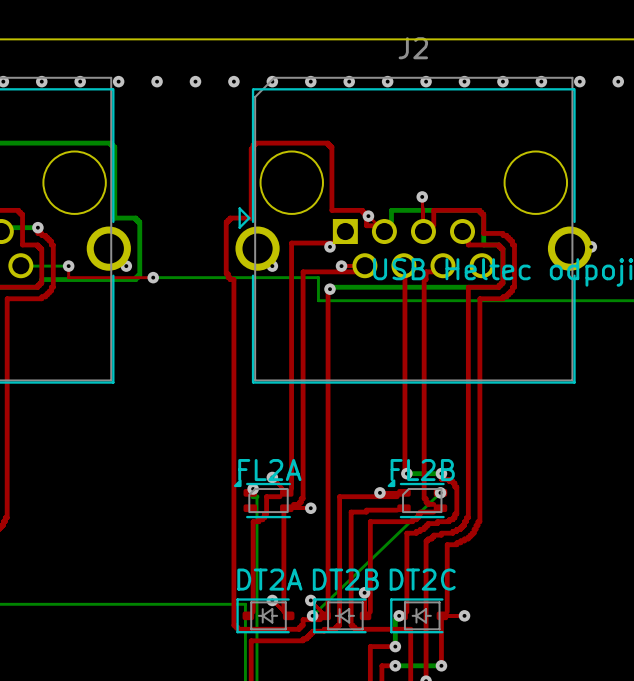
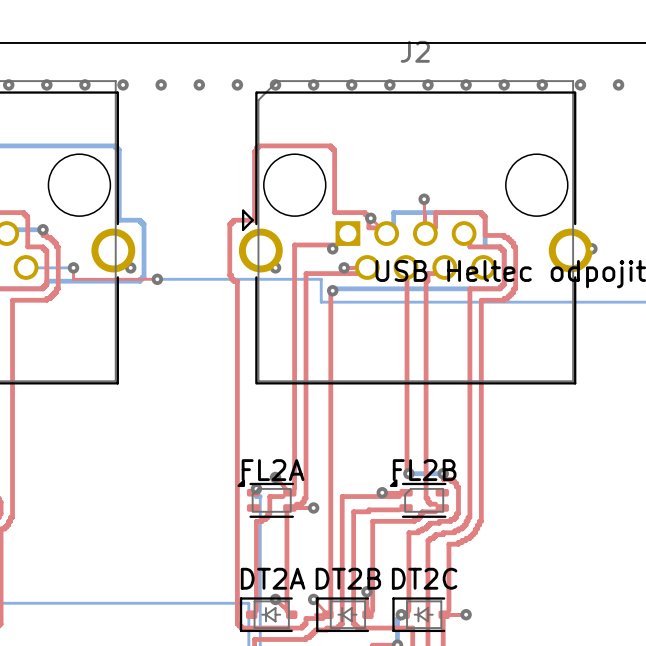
bottom track: (440, 492) (312, 615) -> none
via: (440, 492) -> none
via: (312, 615) -> none

